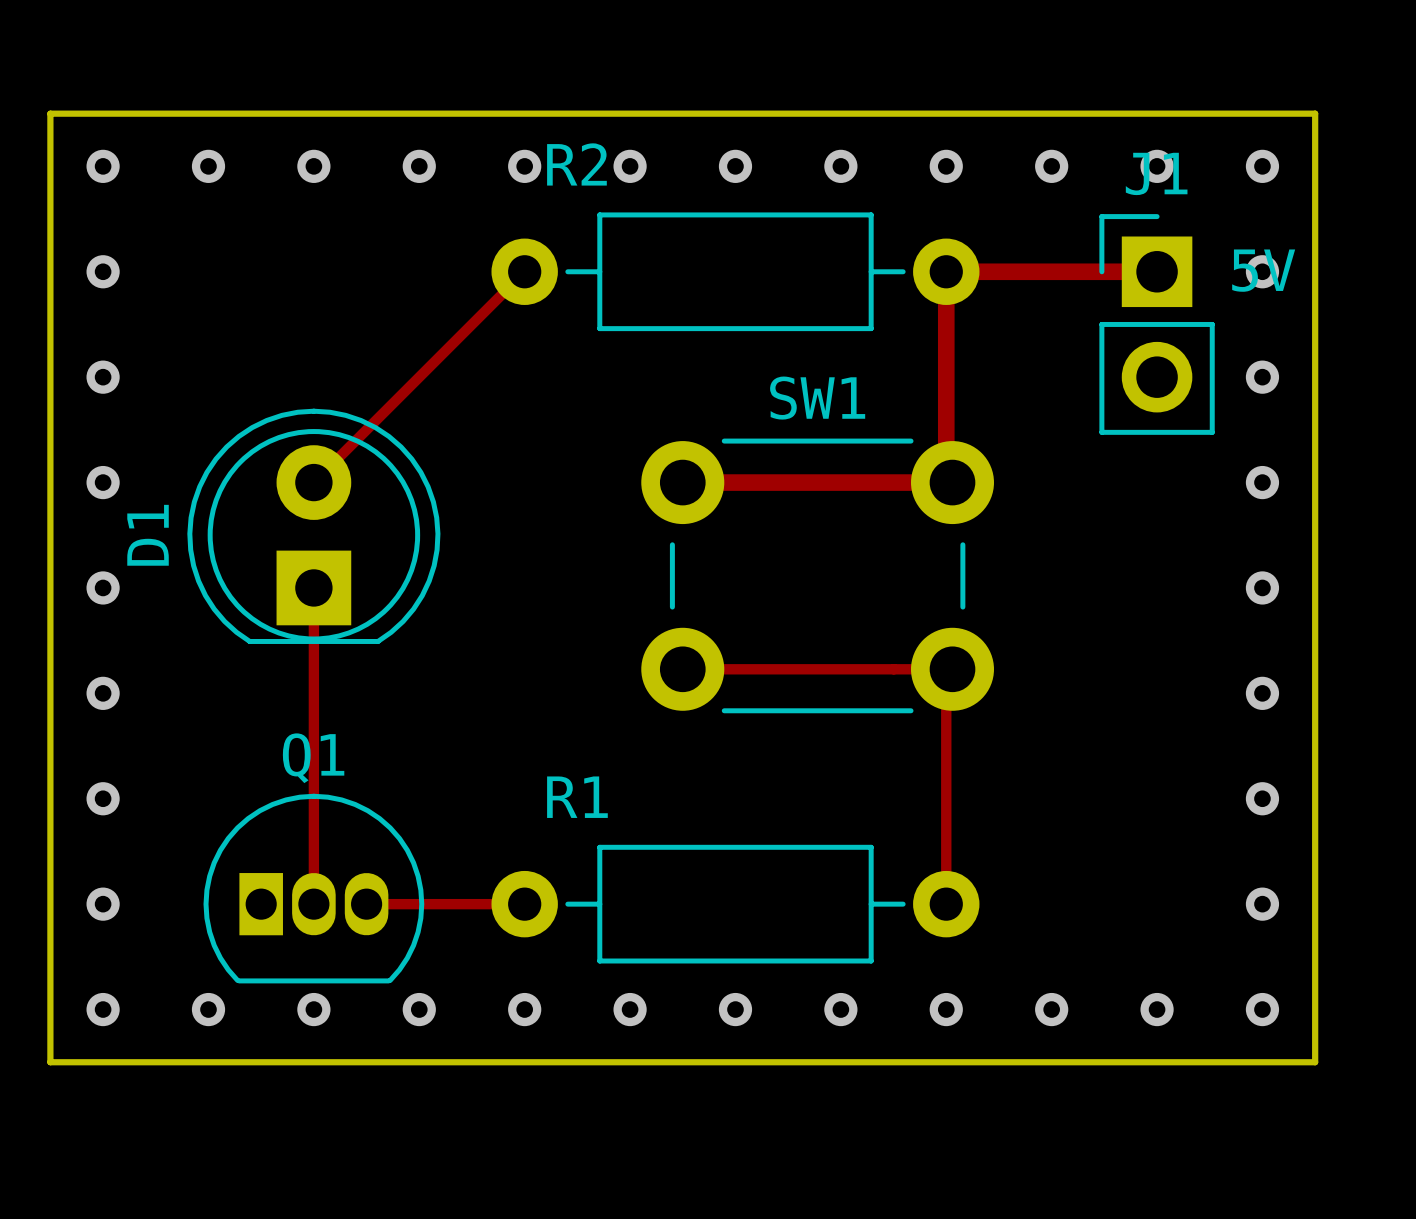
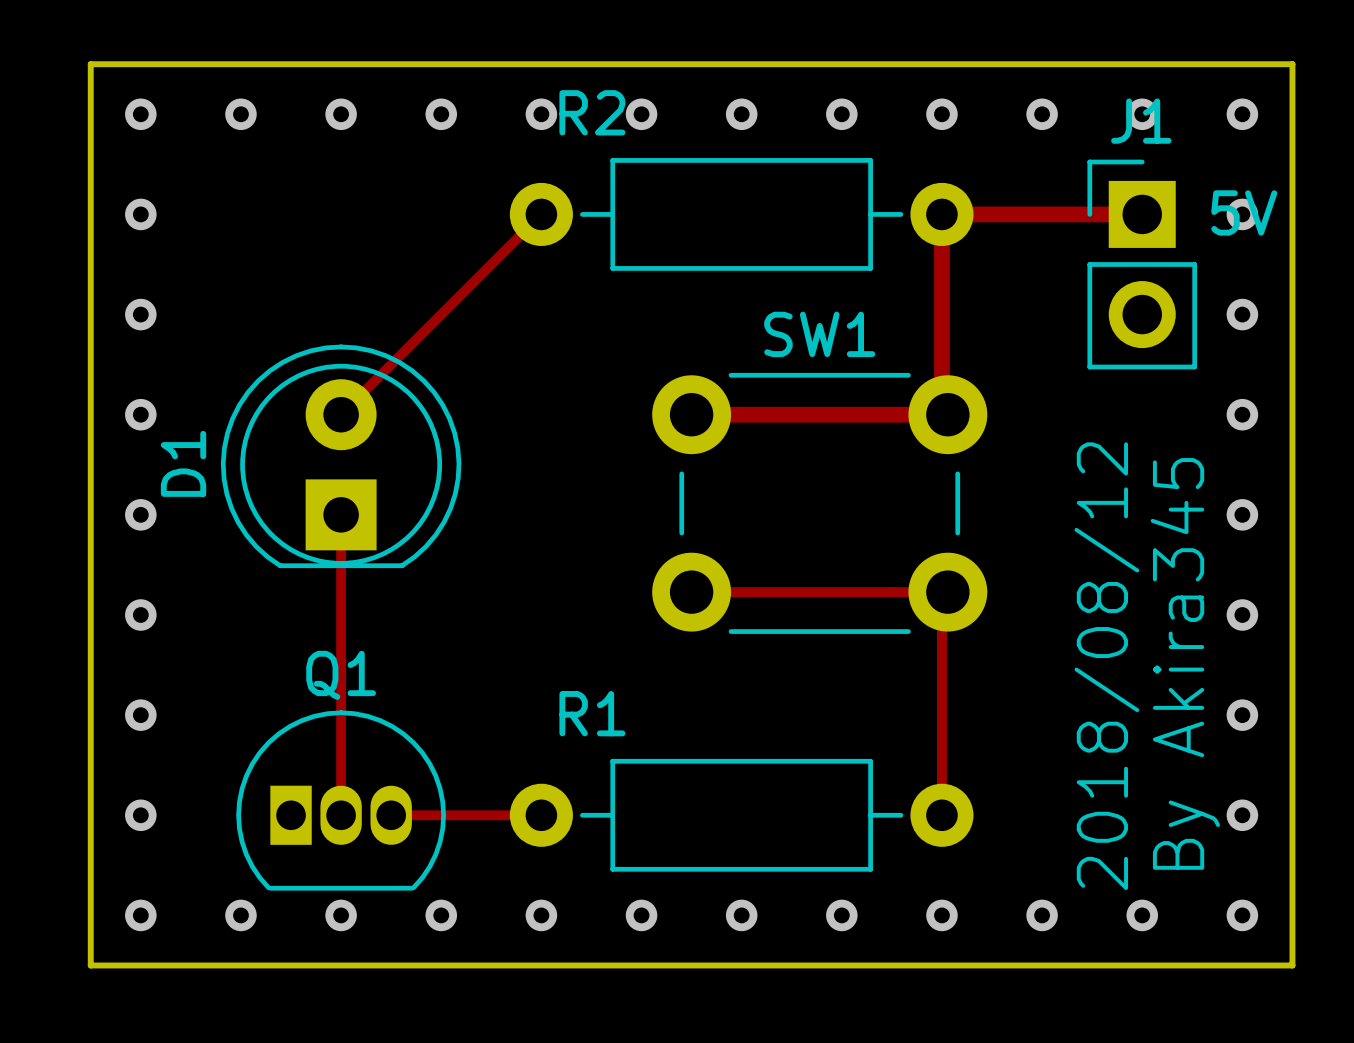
text: none -> 2018/08/12 (1106, 666)
text: none -> By Akira345 (1185, 663)

